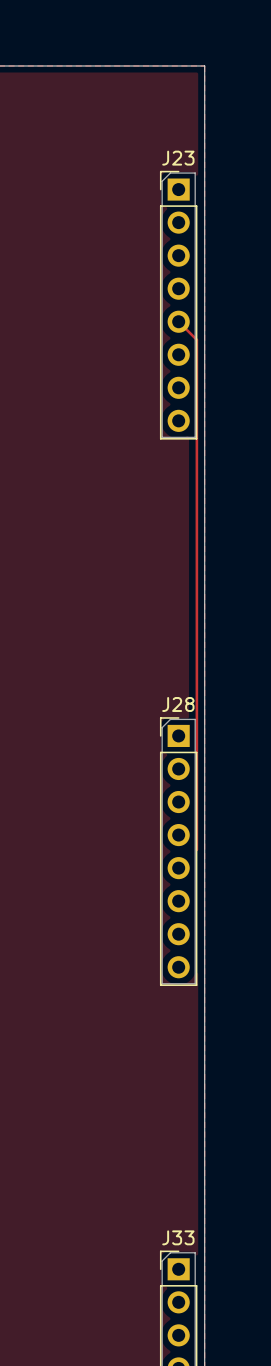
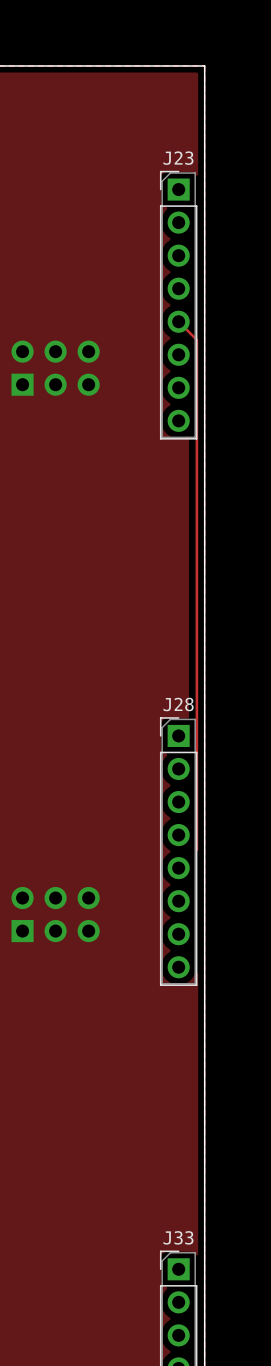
part: none -> (55, 368)
part: none -> (55, 914)

